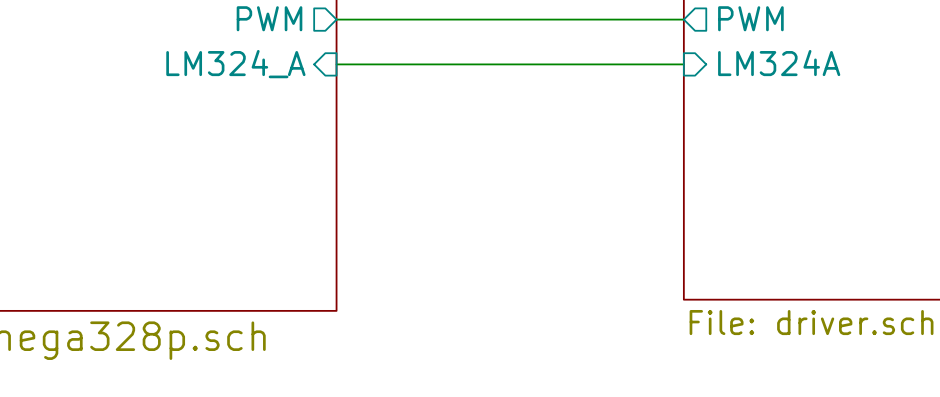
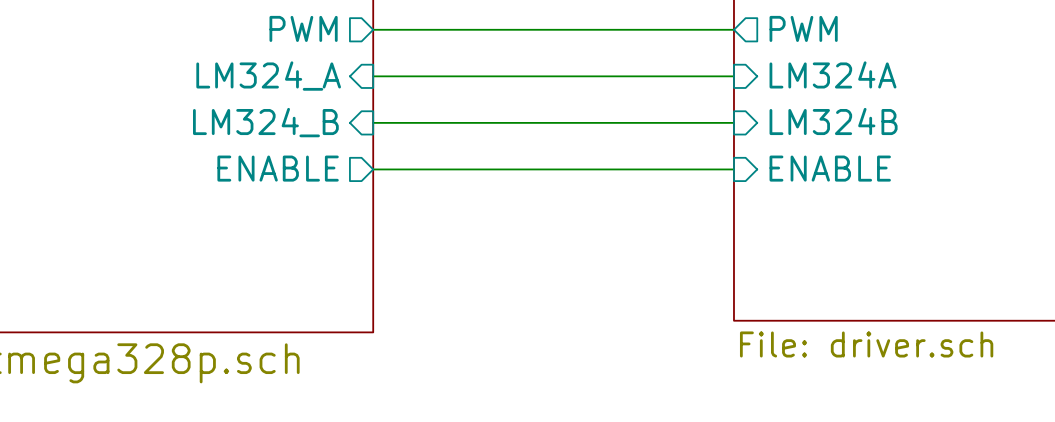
sheet pin: none -> LM324B (833, 121)
sheet pin: none -> LM324_B (265, 122)
wire: none -> (373, 122) (733, 122)
sheet pin: none -> ENABLE (278, 168)
sheet pin: none -> ENABLE (830, 168)
wire: none -> (373, 169) (733, 169)

